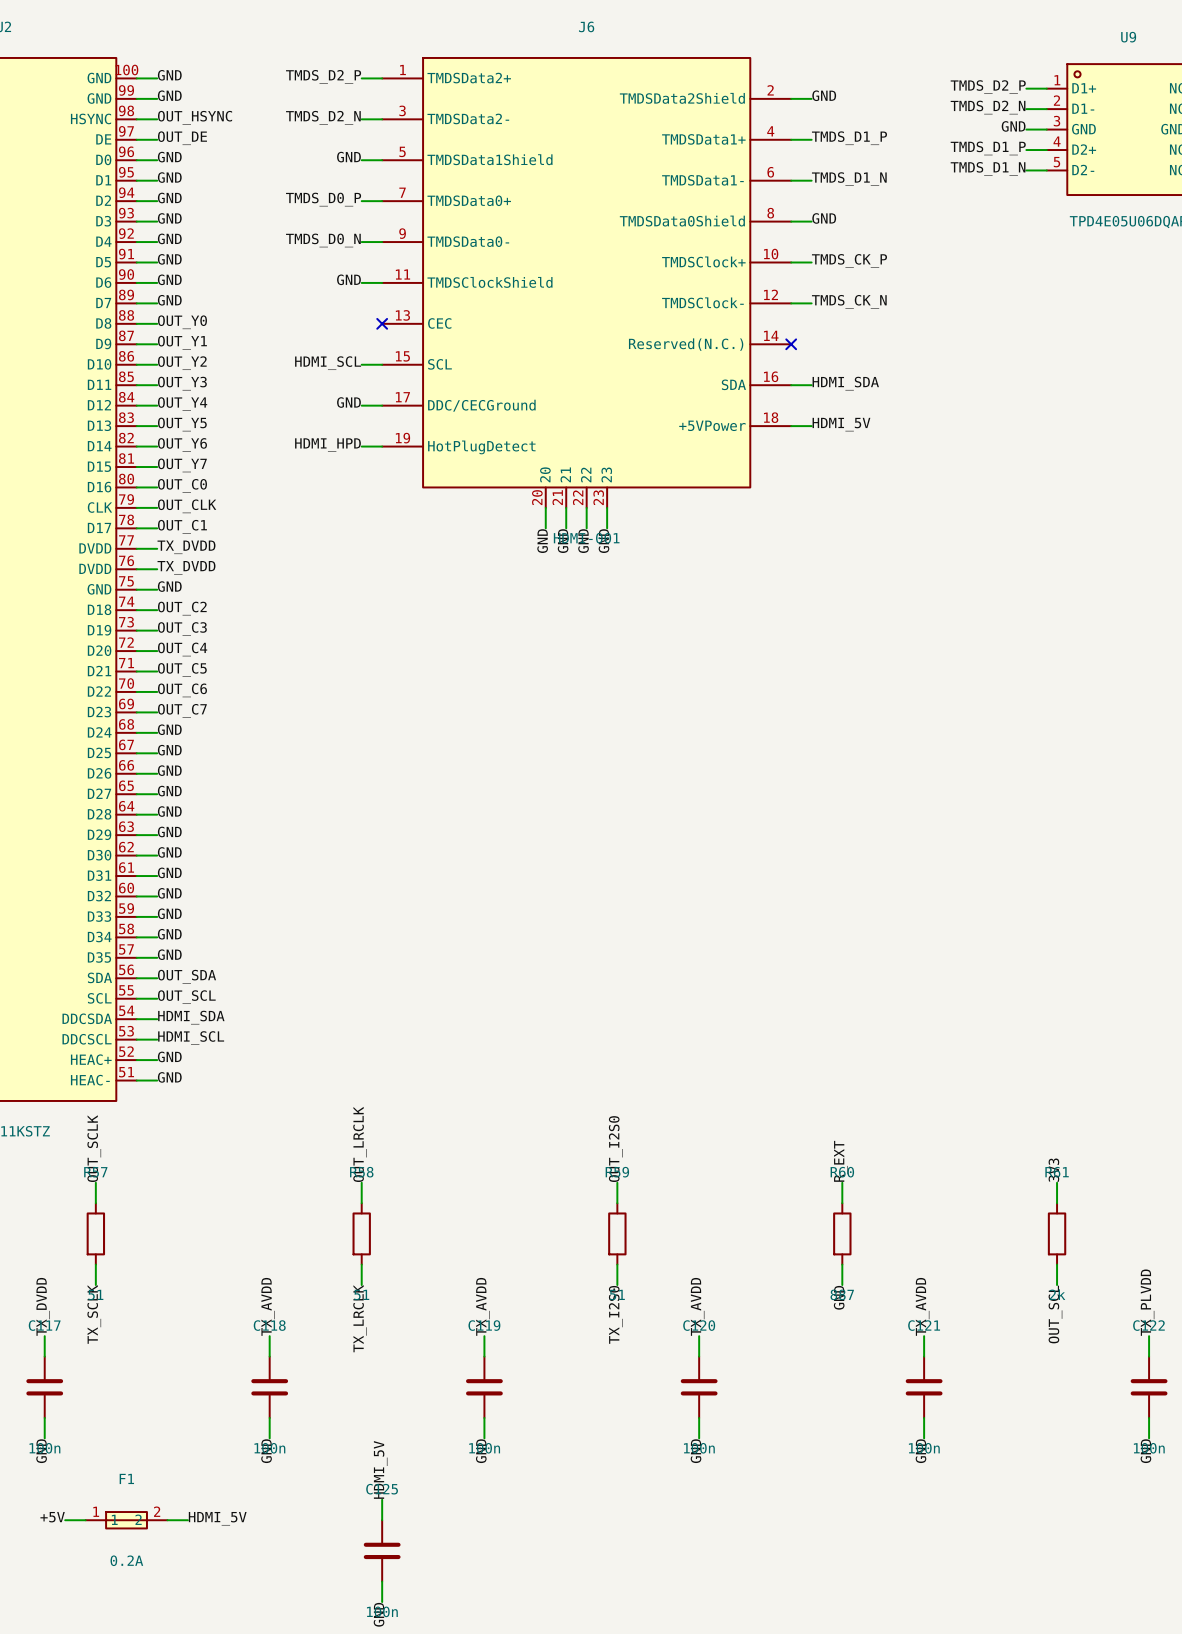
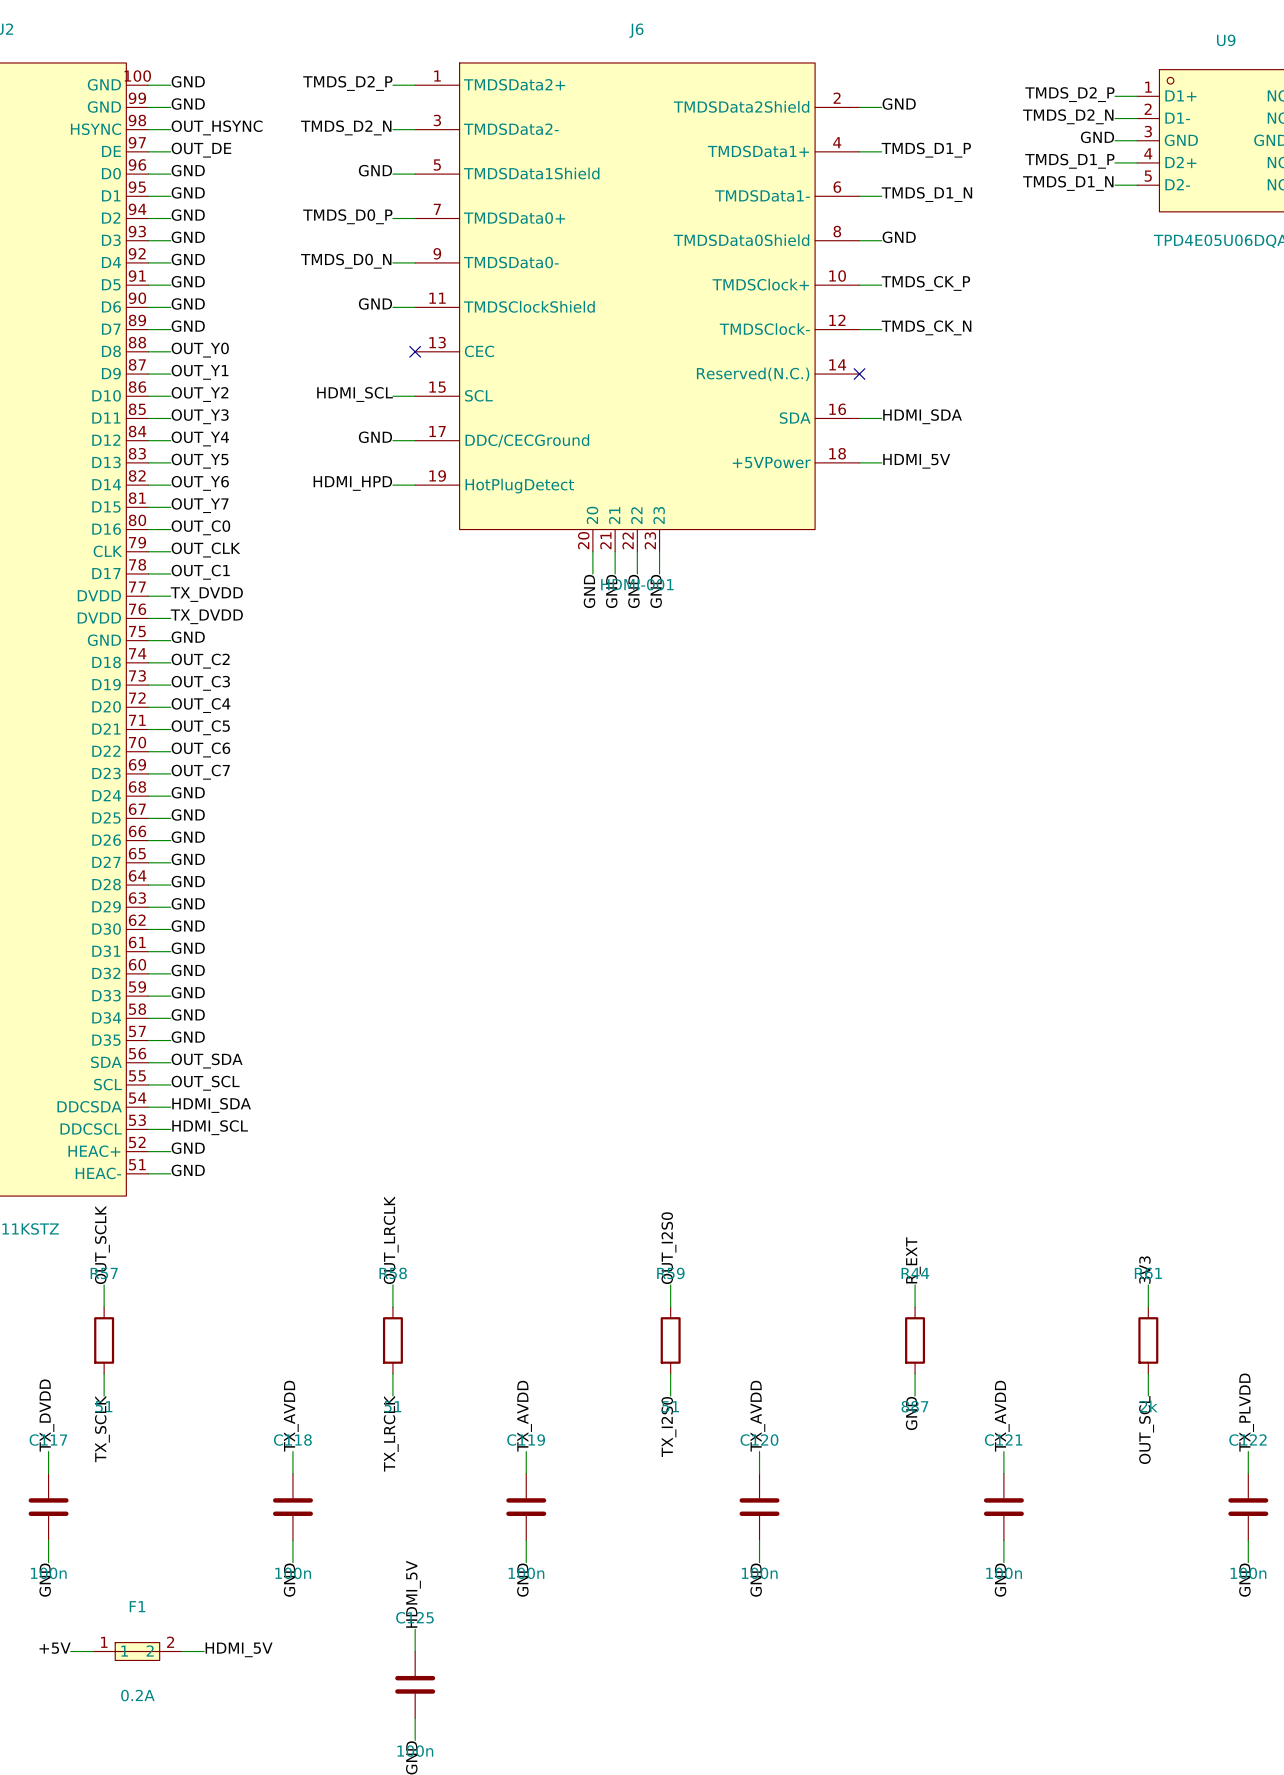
R60 name: R60 (842, 1172) -> R44 (915, 1273)

